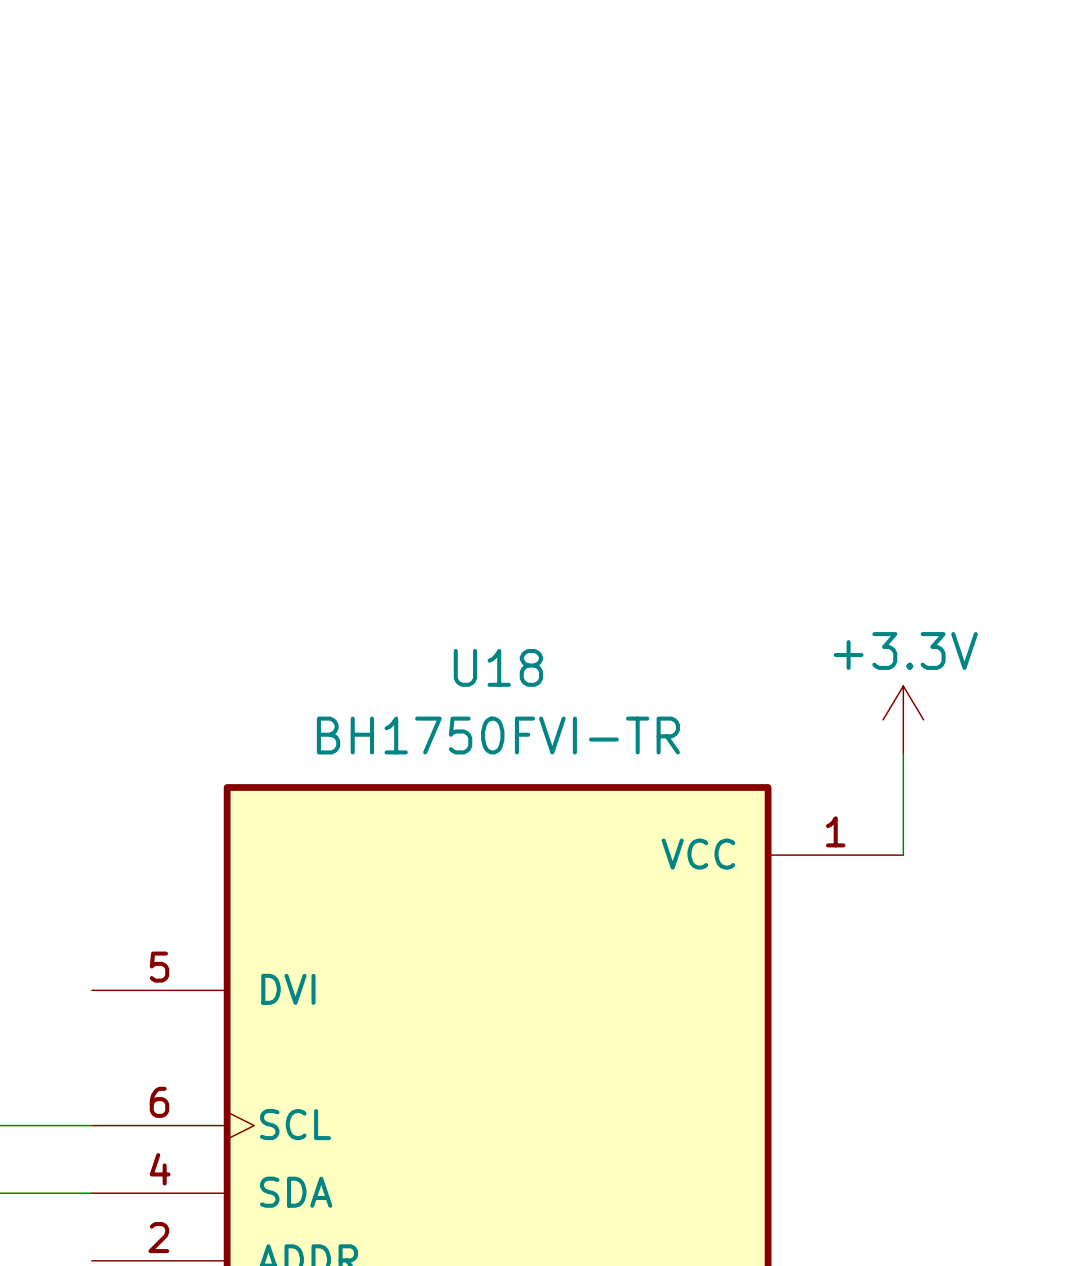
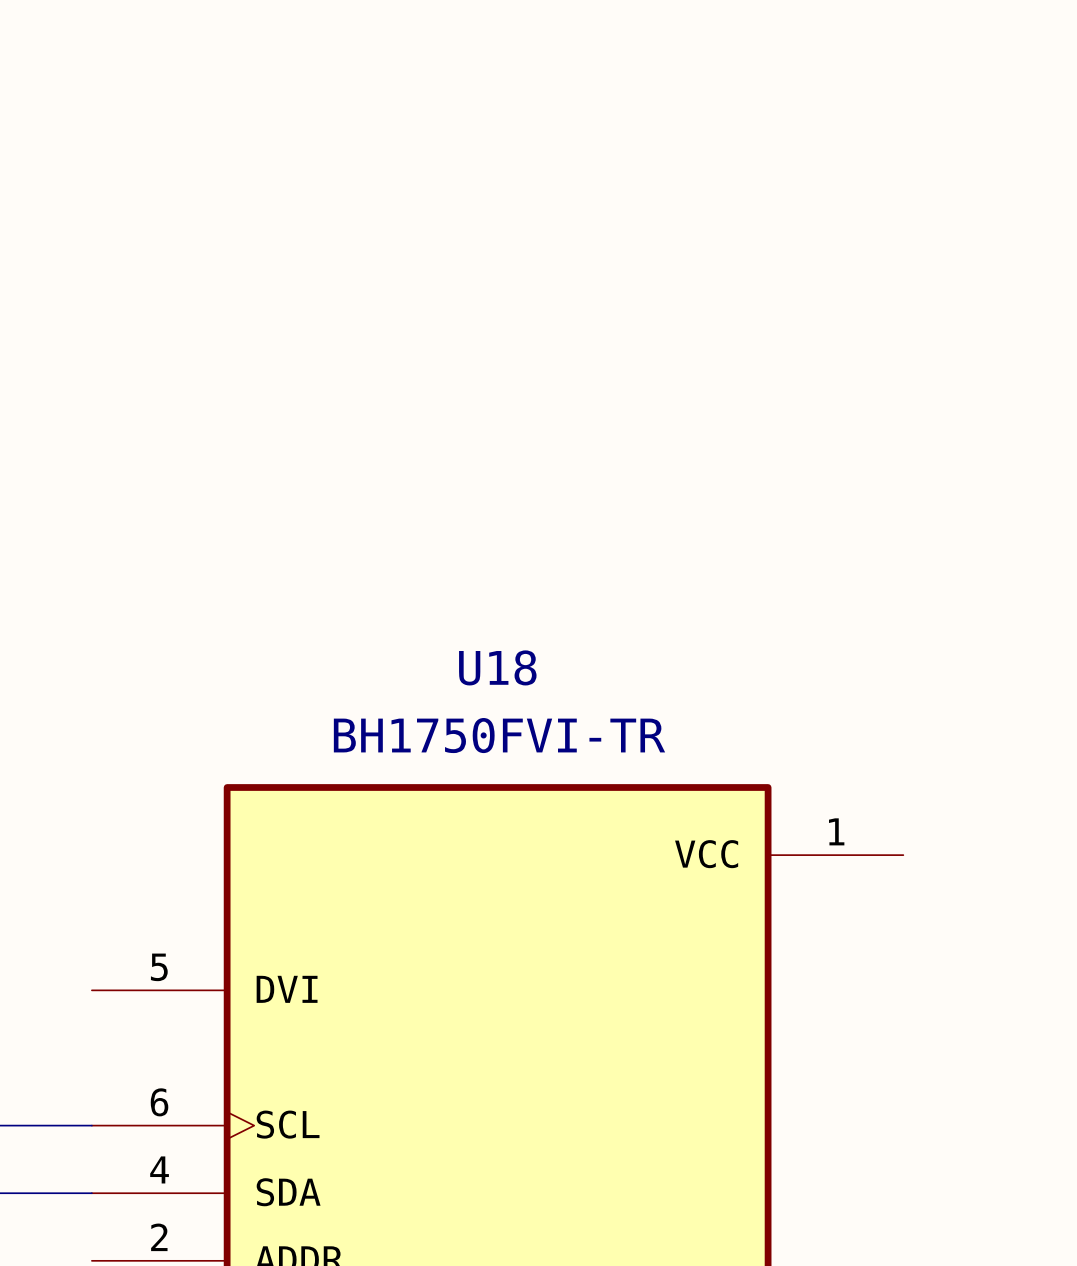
power symbol: +3.3V (903, 719) -> none
wire: (903, 753) (903, 855) -> none

